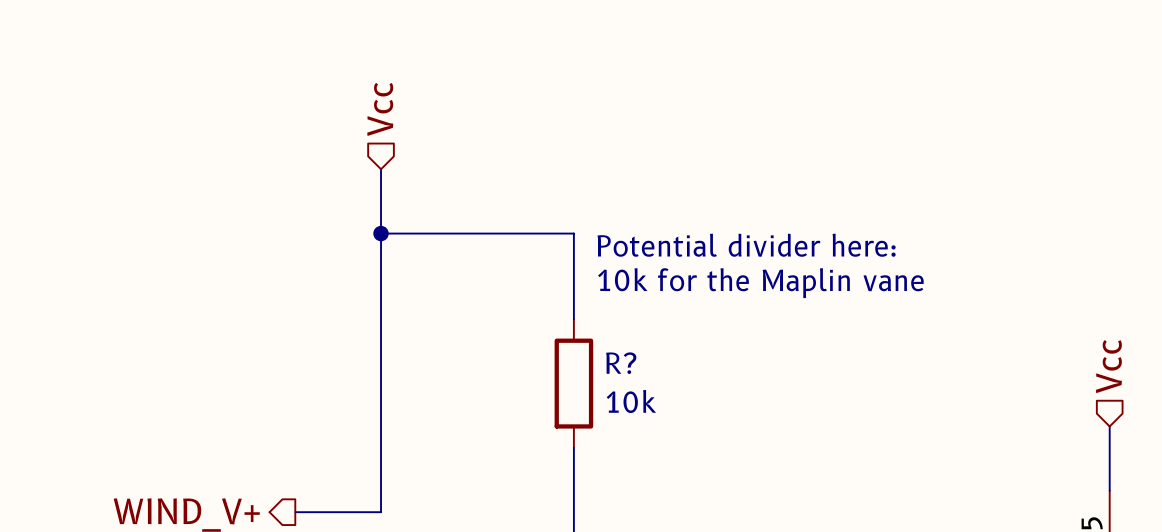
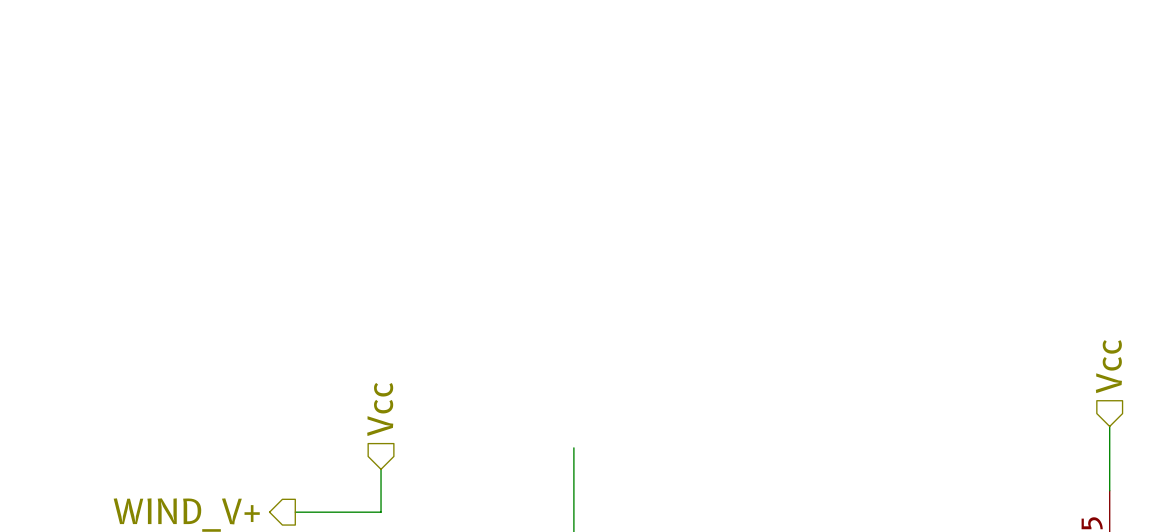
hierarchical label position: Vcc (380, 109) -> Vcc (380, 409)
wire: (381, 169) (381, 469) -> none
wire: (381, 233) (573, 233) (573, 319) -> none
junction: (381, 233) -> none
text: Potential divider here: (746, 245) -> none
text: 10k for the Maplin vane (760, 283) -> none
R?: 10k (573, 383) -> none

